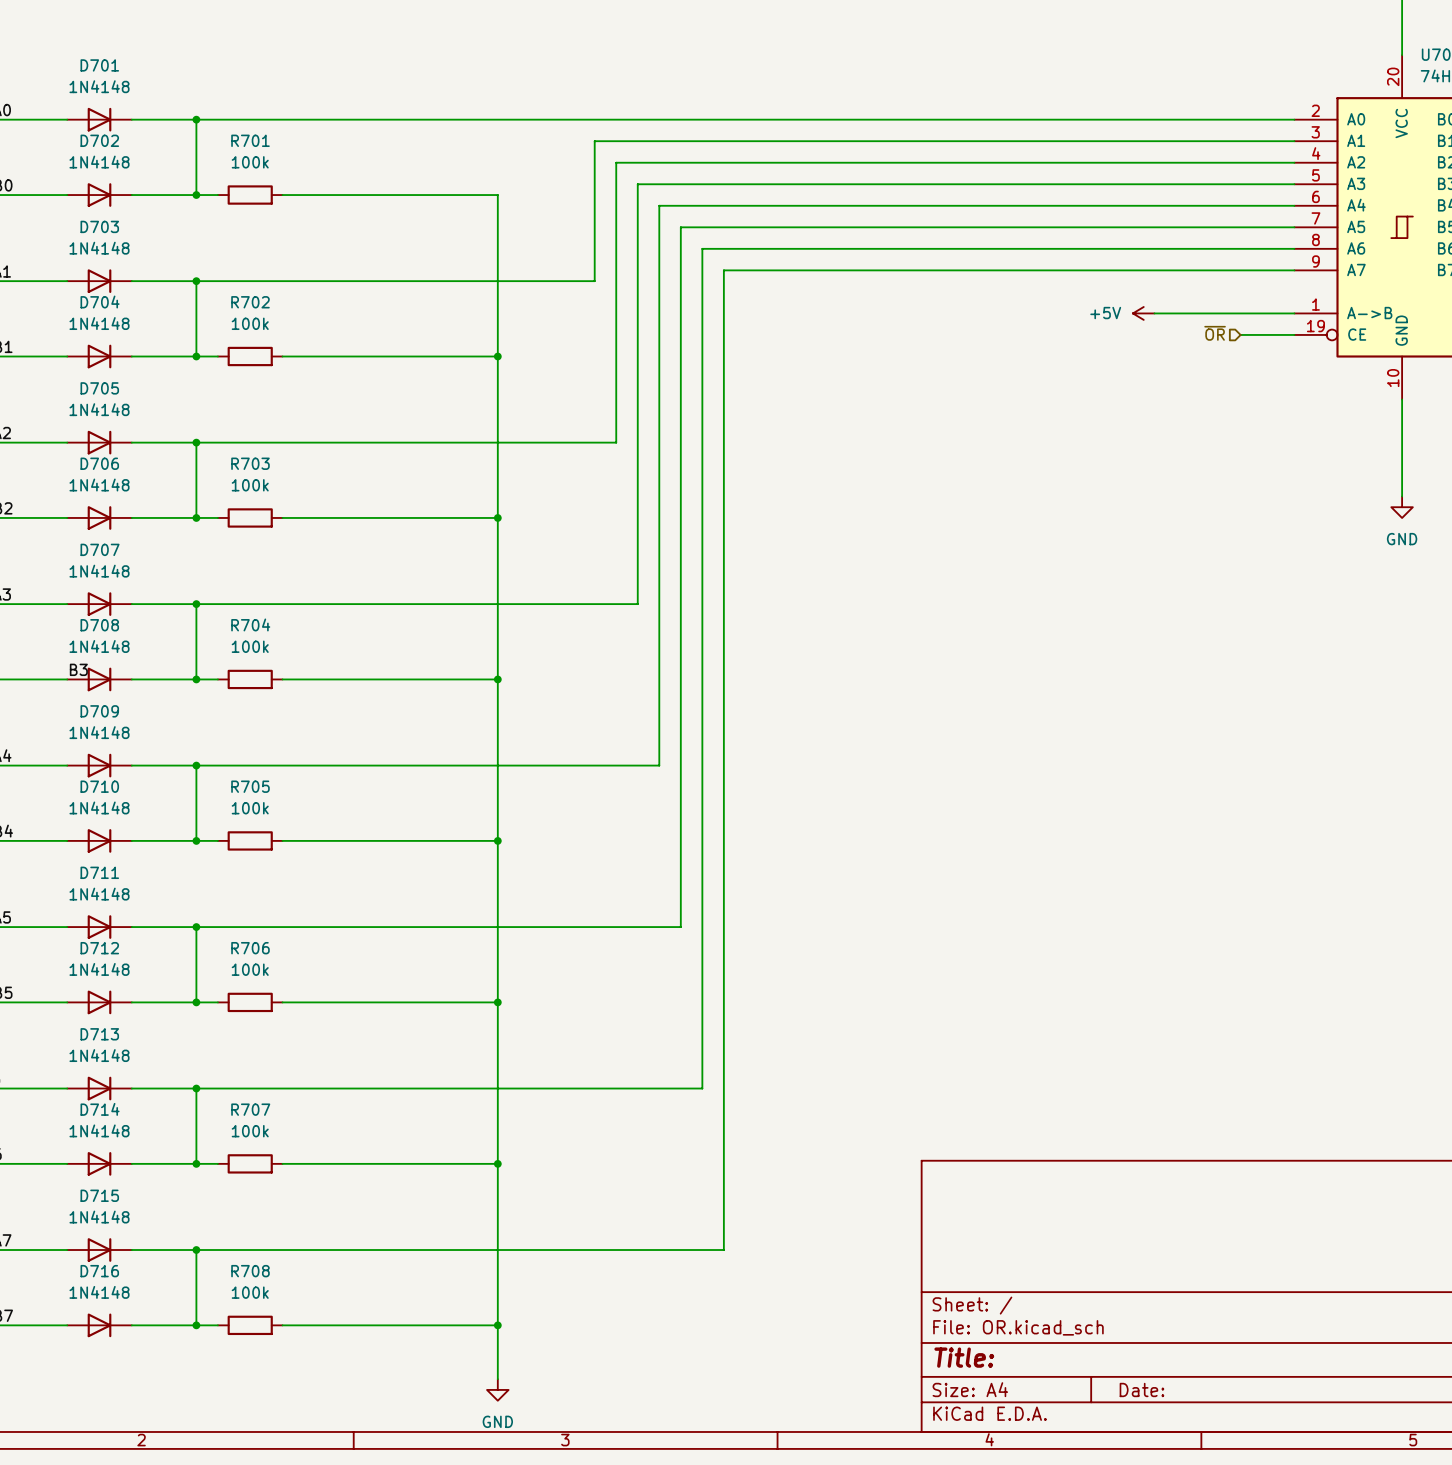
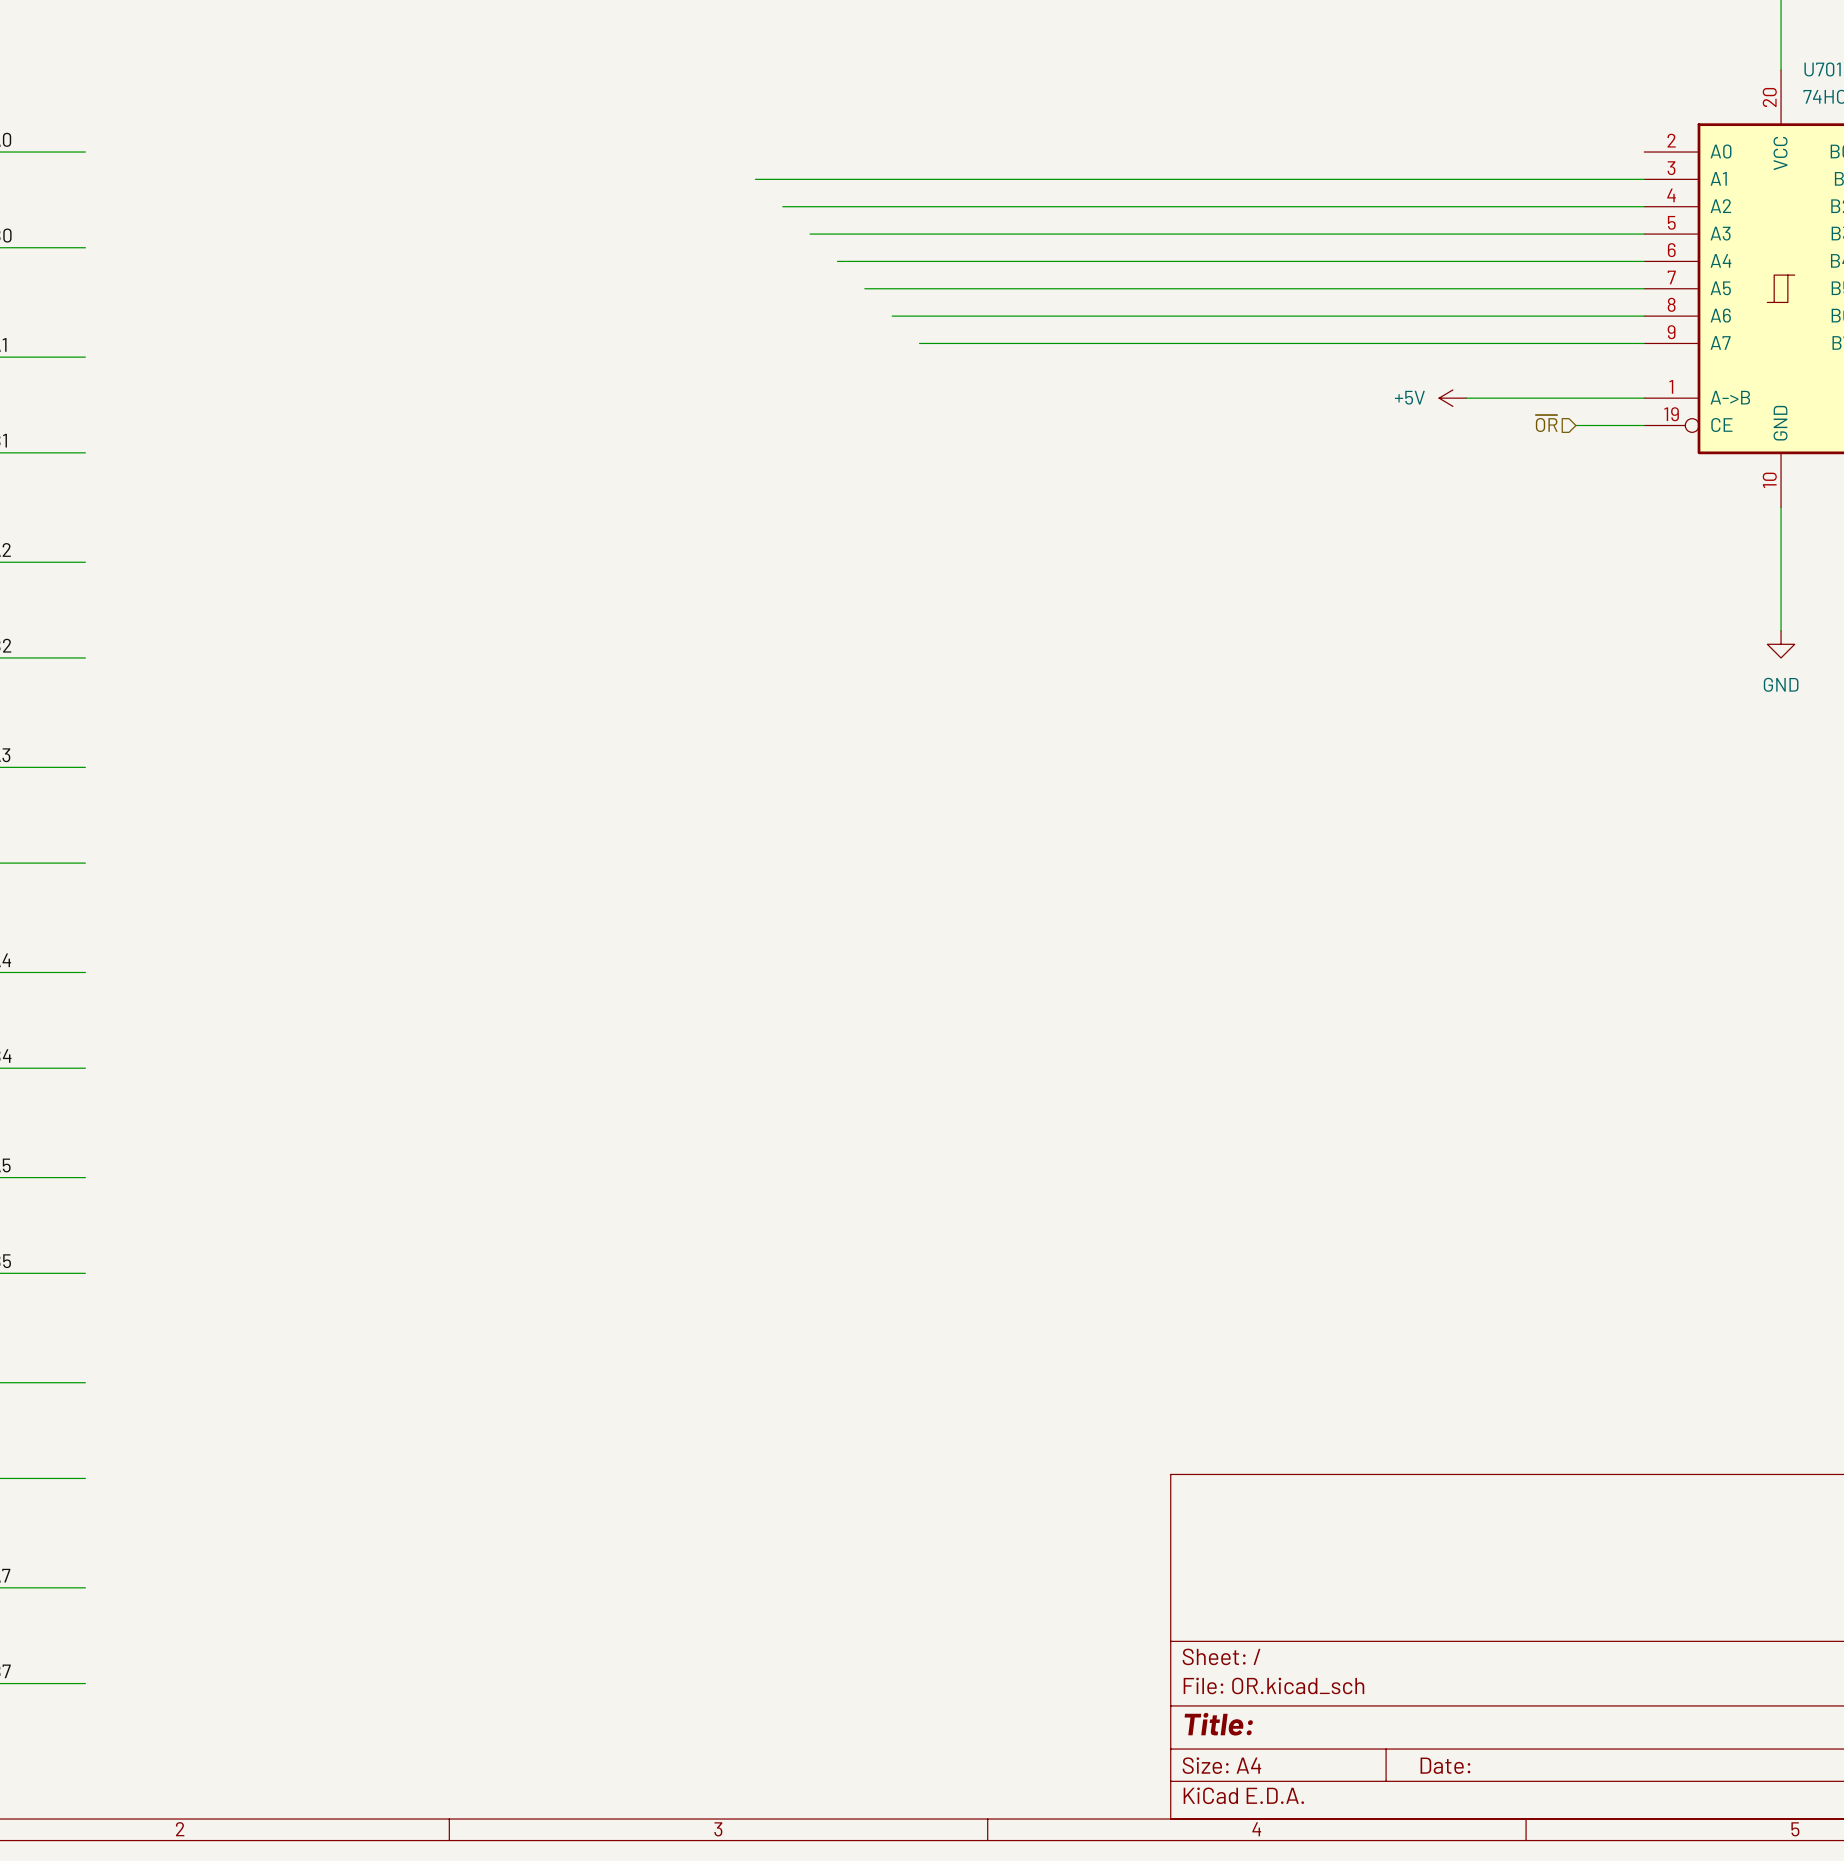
D701: 1N4148 (99, 119) -> none
wire: (131, 119) (1294, 119) -> none
wire: (196, 119) (196, 195) -> none
junction: (196, 119) -> none
wire: (594, 141) (594, 281) (131, 281) -> none
wire: (616, 162) (616, 442) (131, 442) -> none
wire: (637, 184) (637, 604) (131, 604) -> none
D702: 1N4148 (99, 195) -> none
wire: (131, 195) (217, 195) -> none
junction: (196, 195) -> none
R701: 100k (250, 195) -> none
wire: (282, 195) (497, 195) (497, 1379) -> none
wire: (659, 205) (659, 765) (131, 765) -> none
wire: (680, 227) (680, 927) (131, 927) -> none
wire: (702, 248) (702, 1088) (131, 1088) -> none
wire: (723, 270) (723, 1250) (131, 1250) -> none
D703: 1N4148 (99, 281) -> none
wire: (196, 281) (196, 356) -> none
junction: (196, 281) -> none
D704: 1N4148 (99, 356) -> none
wire: (131, 356) (217, 356) -> none
junction: (196, 356) -> none
R702: 100k (250, 356) -> none
wire: (282, 356) (497, 356) -> none
junction: (497, 356) -> none
D705: 1N4148 (99, 442) -> none
wire: (196, 442) (196, 517) -> none
junction: (196, 442) -> none
D706: 1N4148 (99, 517) -> none
wire: (131, 517) (217, 517) -> none
junction: (196, 517) -> none
R703: 100k (250, 517) -> none
wire: (282, 517) (497, 517) -> none
junction: (497, 517) -> none
D707: 1N4148 (99, 604) -> none
wire: (196, 604) (196, 679) -> none
junction: (196, 604) -> none
label: B3 (78, 669) -> none
D708: 1N4148 (99, 679) -> none
wire: (131, 679) (217, 679) -> none
junction: (196, 679) -> none
R704: 100k (250, 679) -> none
wire: (282, 679) (497, 679) -> none
junction: (497, 679) -> none
D709: 1N4148 (99, 765) -> none
wire: (196, 765) (196, 840) -> none
junction: (196, 765) -> none
D710: 1N4148 (99, 840) -> none
wire: (131, 840) (217, 840) -> none
junction: (196, 840) -> none
R705: 100k (250, 840) -> none
wire: (282, 840) (497, 840) -> none
junction: (497, 840) -> none
D711: 1N4148 (99, 927) -> none
wire: (196, 927) (196, 1002) -> none
junction: (196, 927) -> none
D712: 1N4148 (99, 1002) -> none
wire: (131, 1002) (217, 1002) -> none
junction: (196, 1002) -> none
R706: 100k (250, 1002) -> none
wire: (282, 1002) (497, 1002) -> none
junction: (497, 1002) -> none
D713: 1N4148 (99, 1088) -> none
wire: (196, 1088) (196, 1163) -> none
junction: (196, 1088) -> none
D714: 1N4148 (99, 1163) -> none
wire: (131, 1163) (217, 1163) -> none
junction: (196, 1163) -> none
R707: 100k (250, 1163) -> none
wire: (282, 1163) (497, 1163) -> none
junction: (497, 1163) -> none
D715: 1N4148 (99, 1250) -> none
wire: (196, 1250) (196, 1325) -> none
junction: (196, 1250) -> none
D716: 1N4148 (99, 1325) -> none
wire: (131, 1325) (217, 1325) -> none
junction: (196, 1325) -> none
R708: 100k (250, 1325) -> none
wire: (282, 1325) (497, 1325) -> none
junction: (497, 1325) -> none
power symbol: GND (497, 1389) -> none

